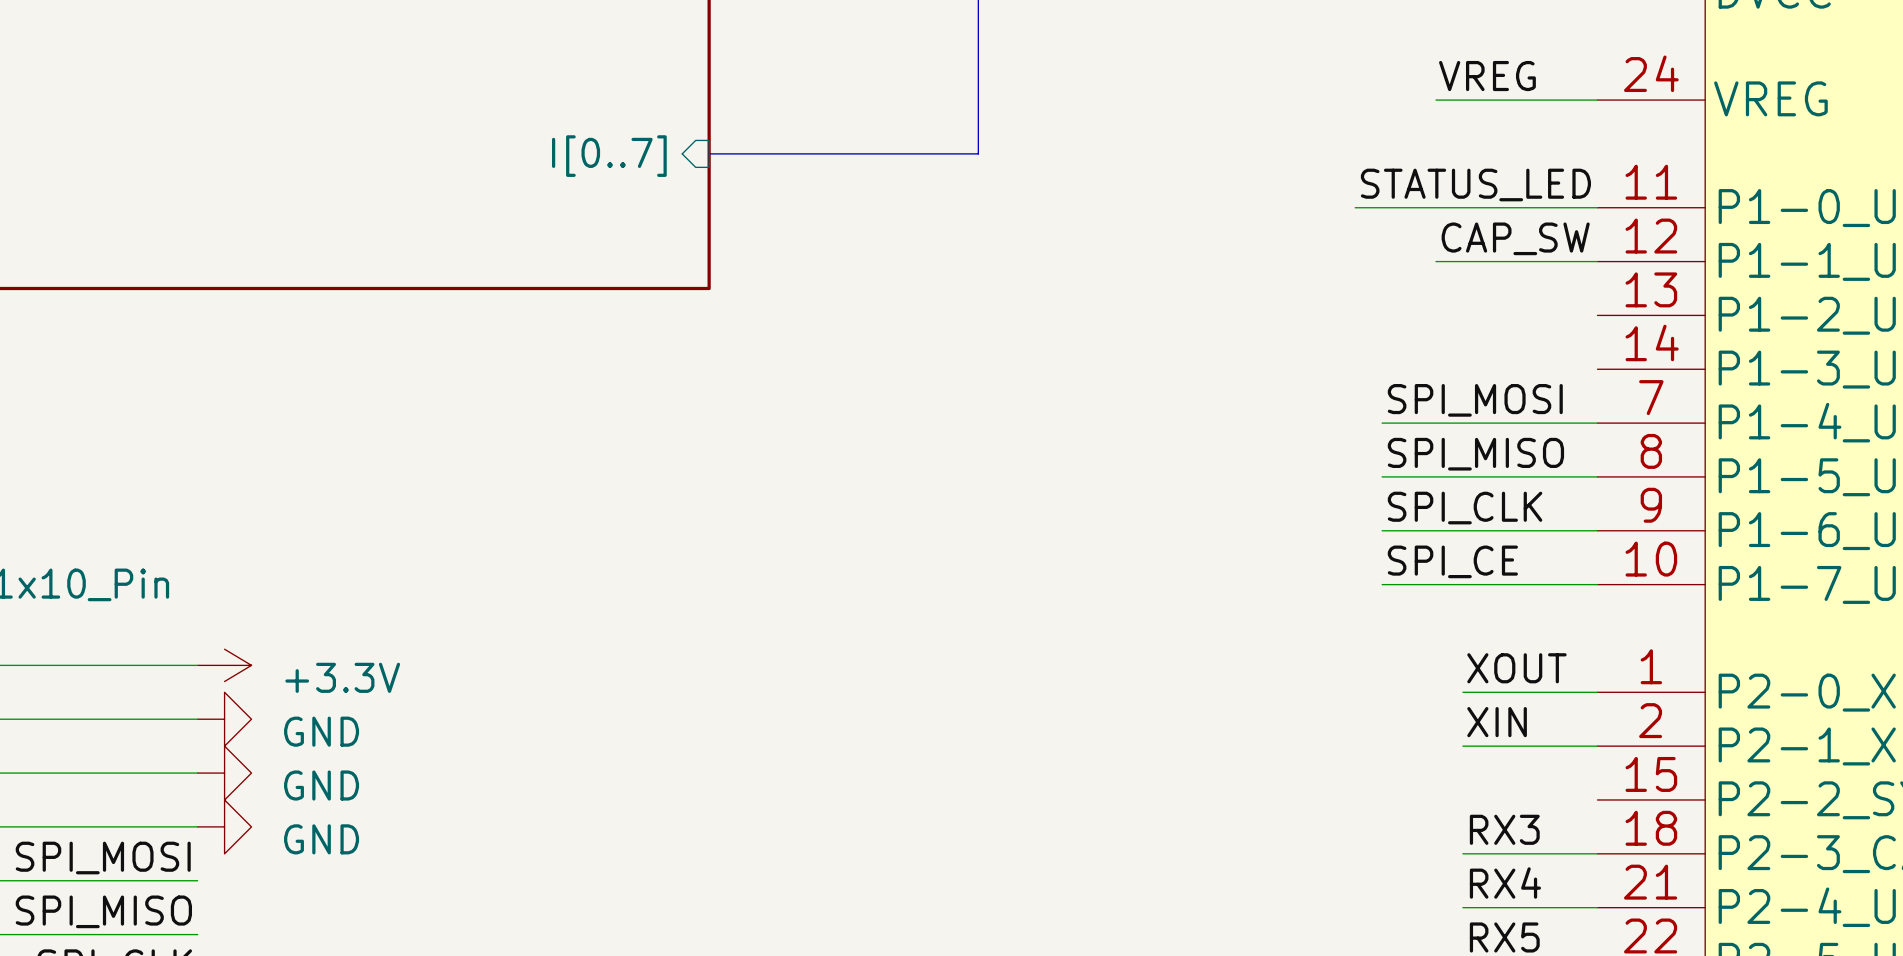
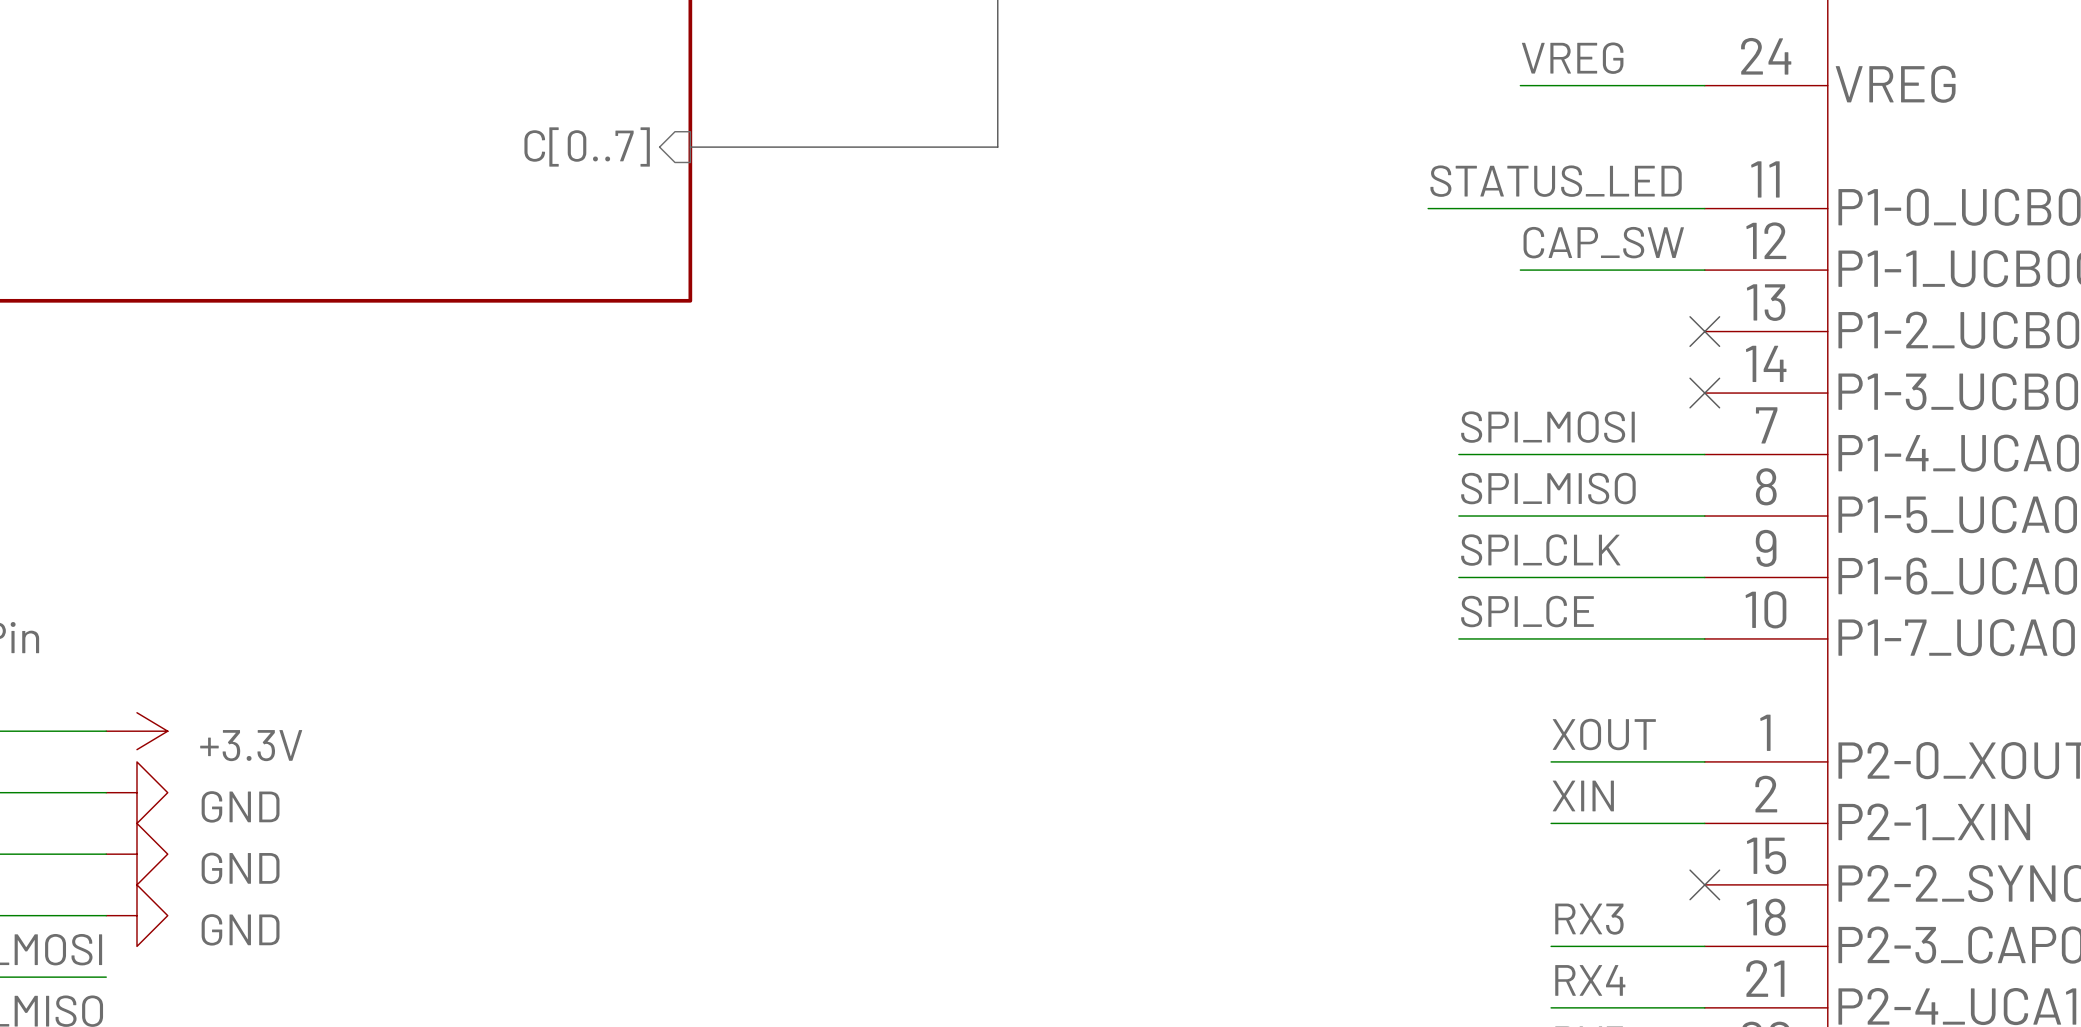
sheet pin: I[0..7] (609, 156) -> C[0..7] (587, 146)
no-connect mark: none -> (1704, 331)
no-connect mark: none -> (1704, 393)
no-connect mark: none -> (1704, 884)

